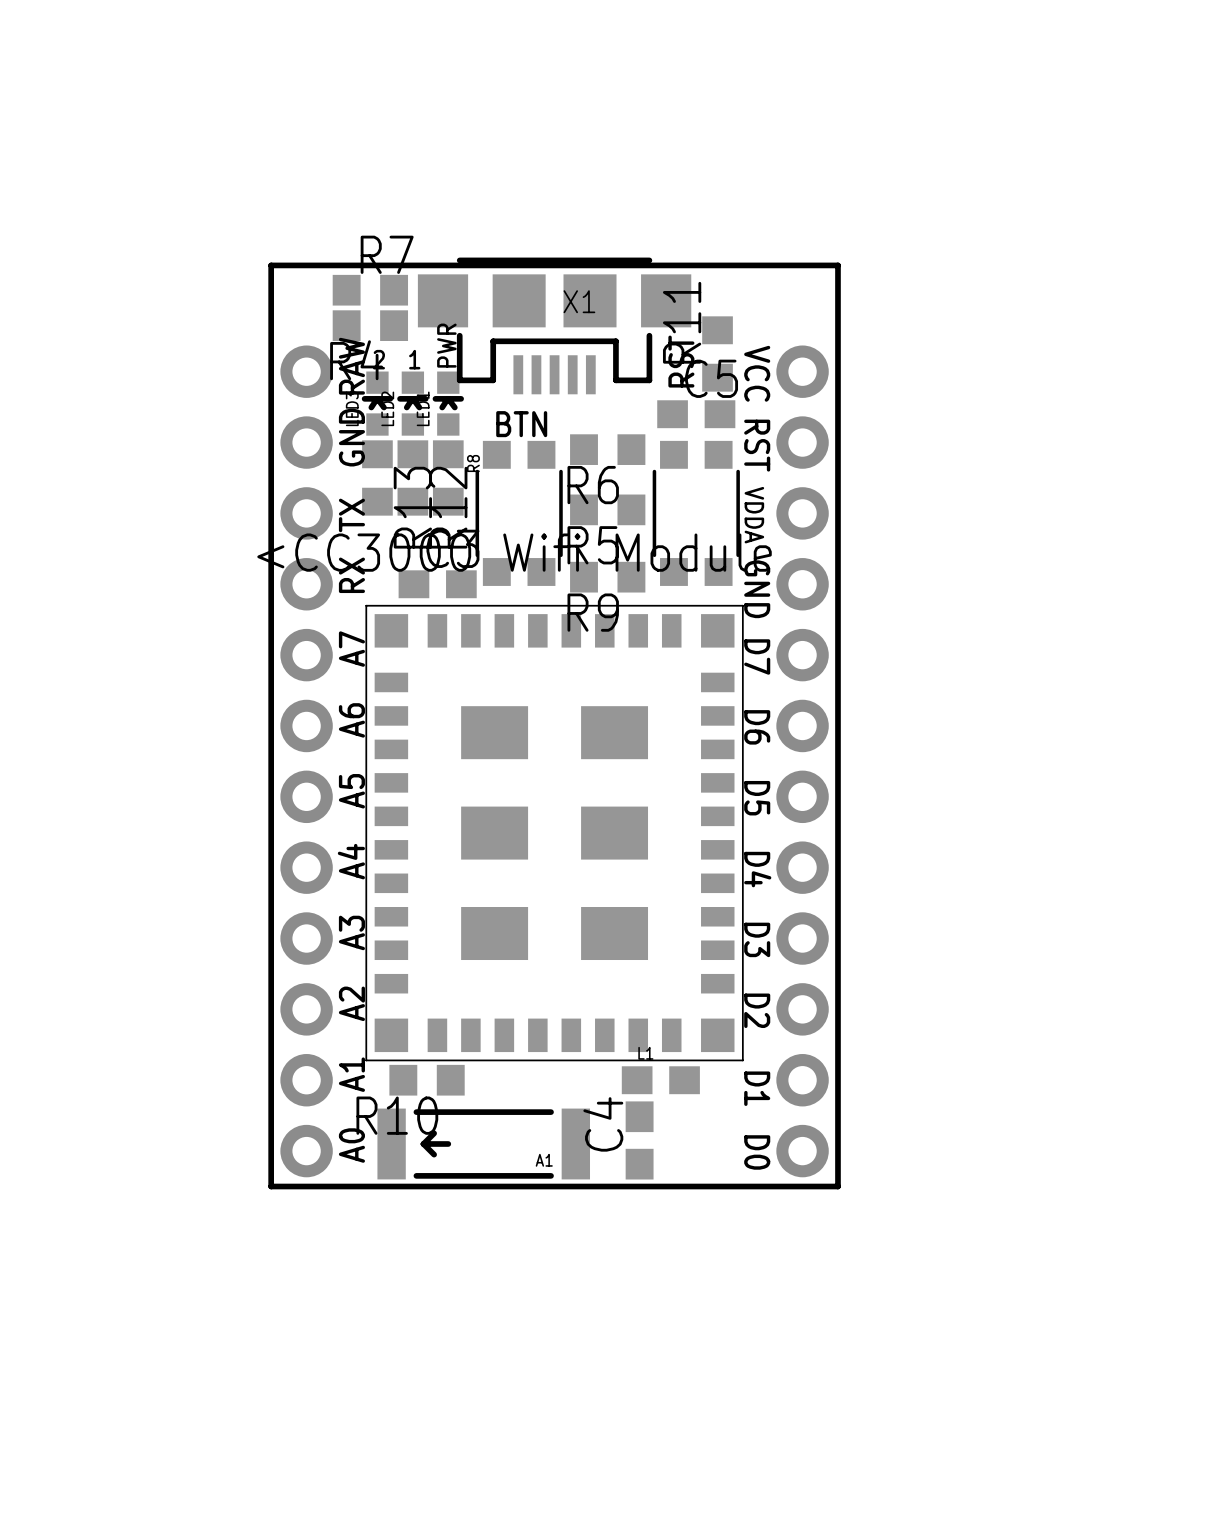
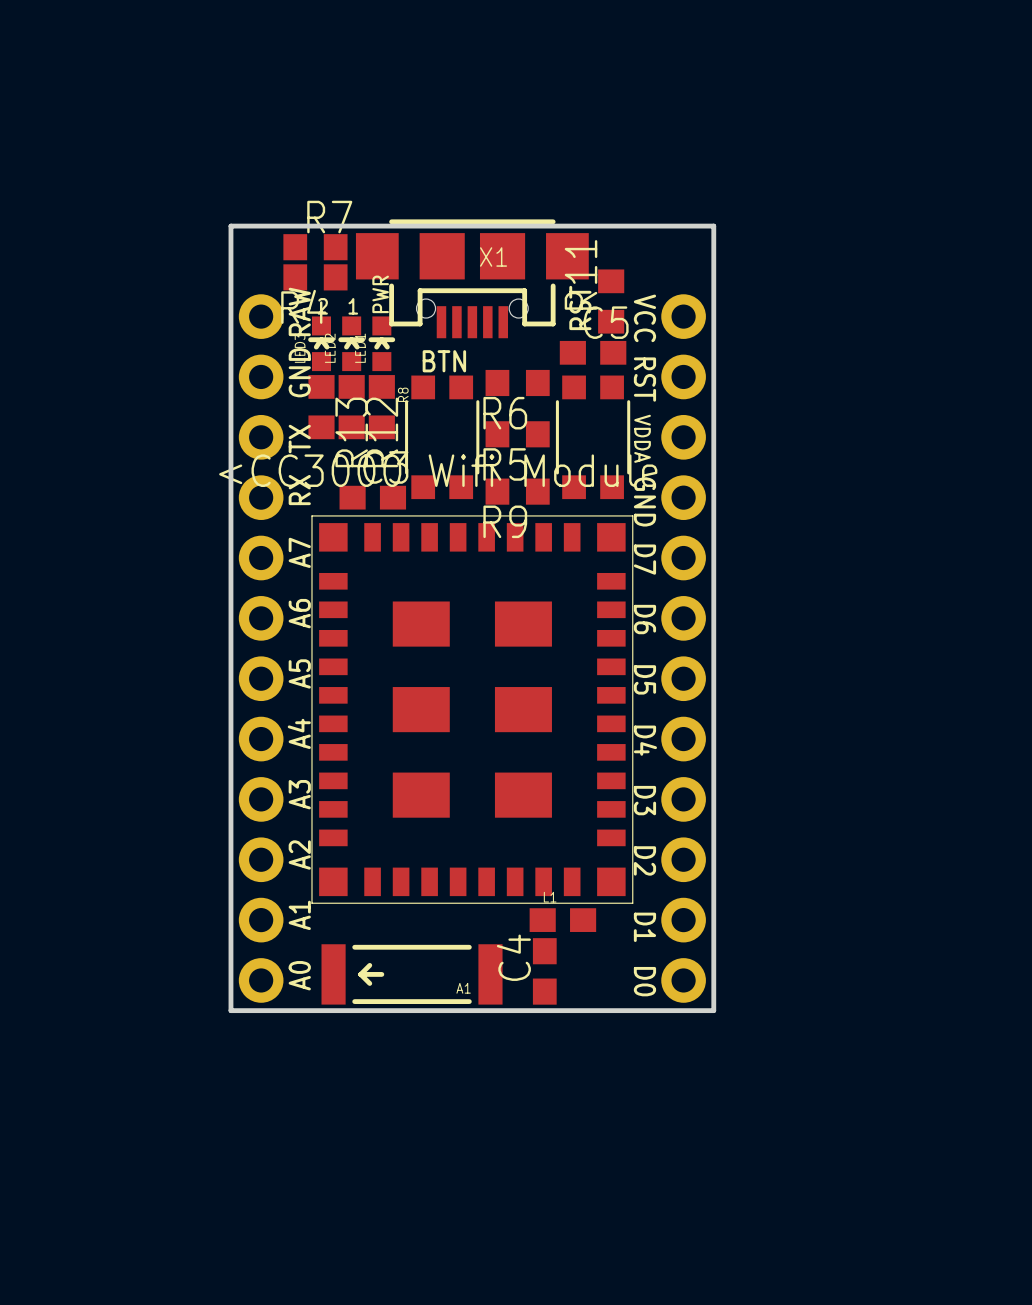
X1 footprint: [417, 257, 692, 395] -> [355, 219, 589, 339]
R10: (427, 1080) -> none

